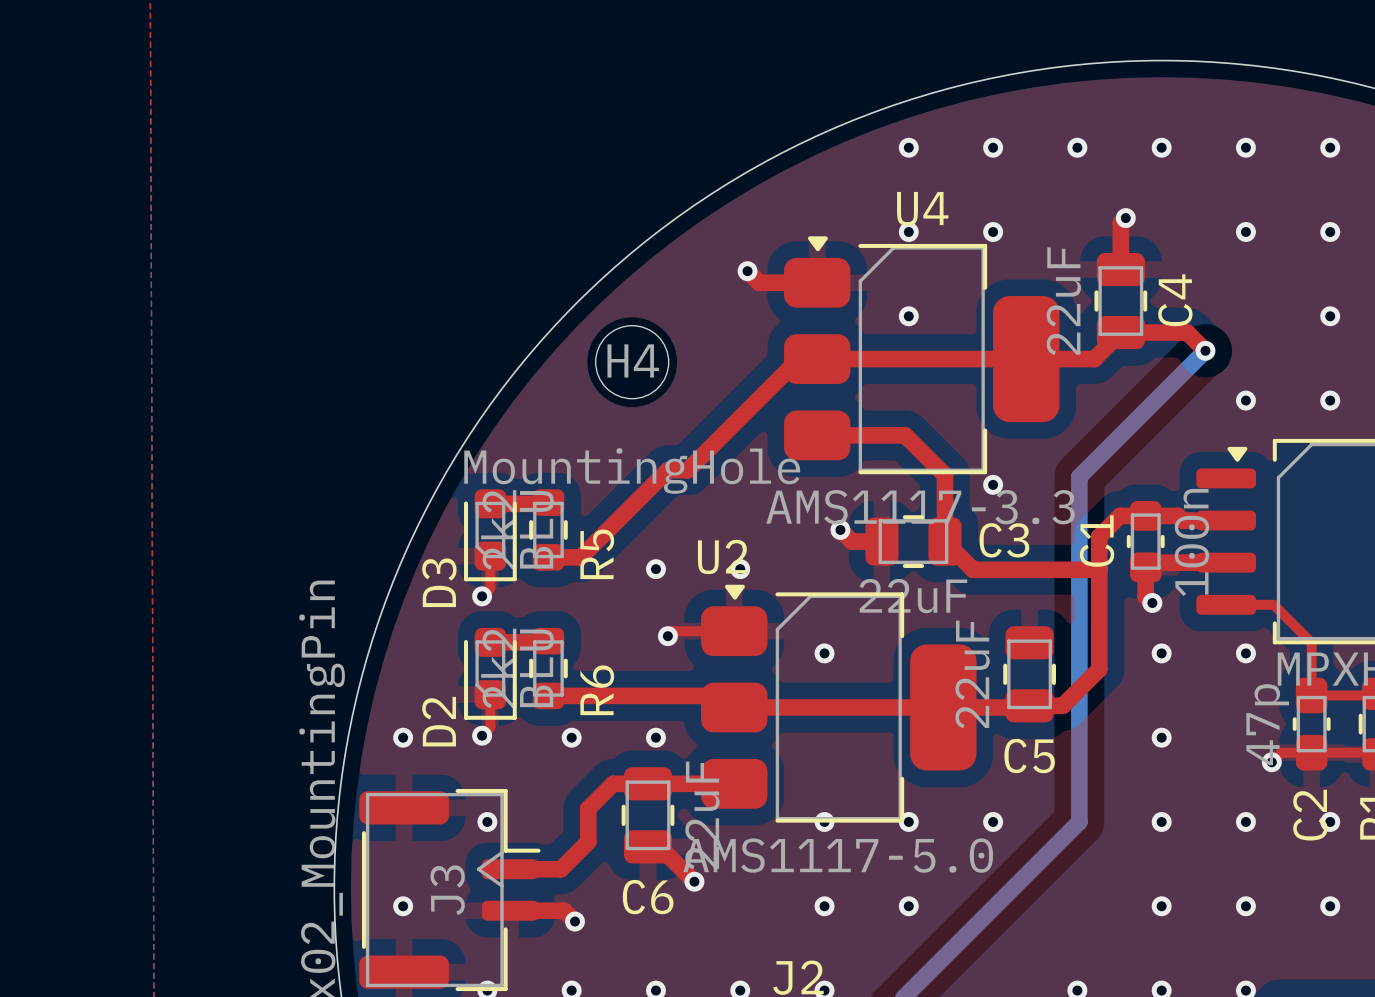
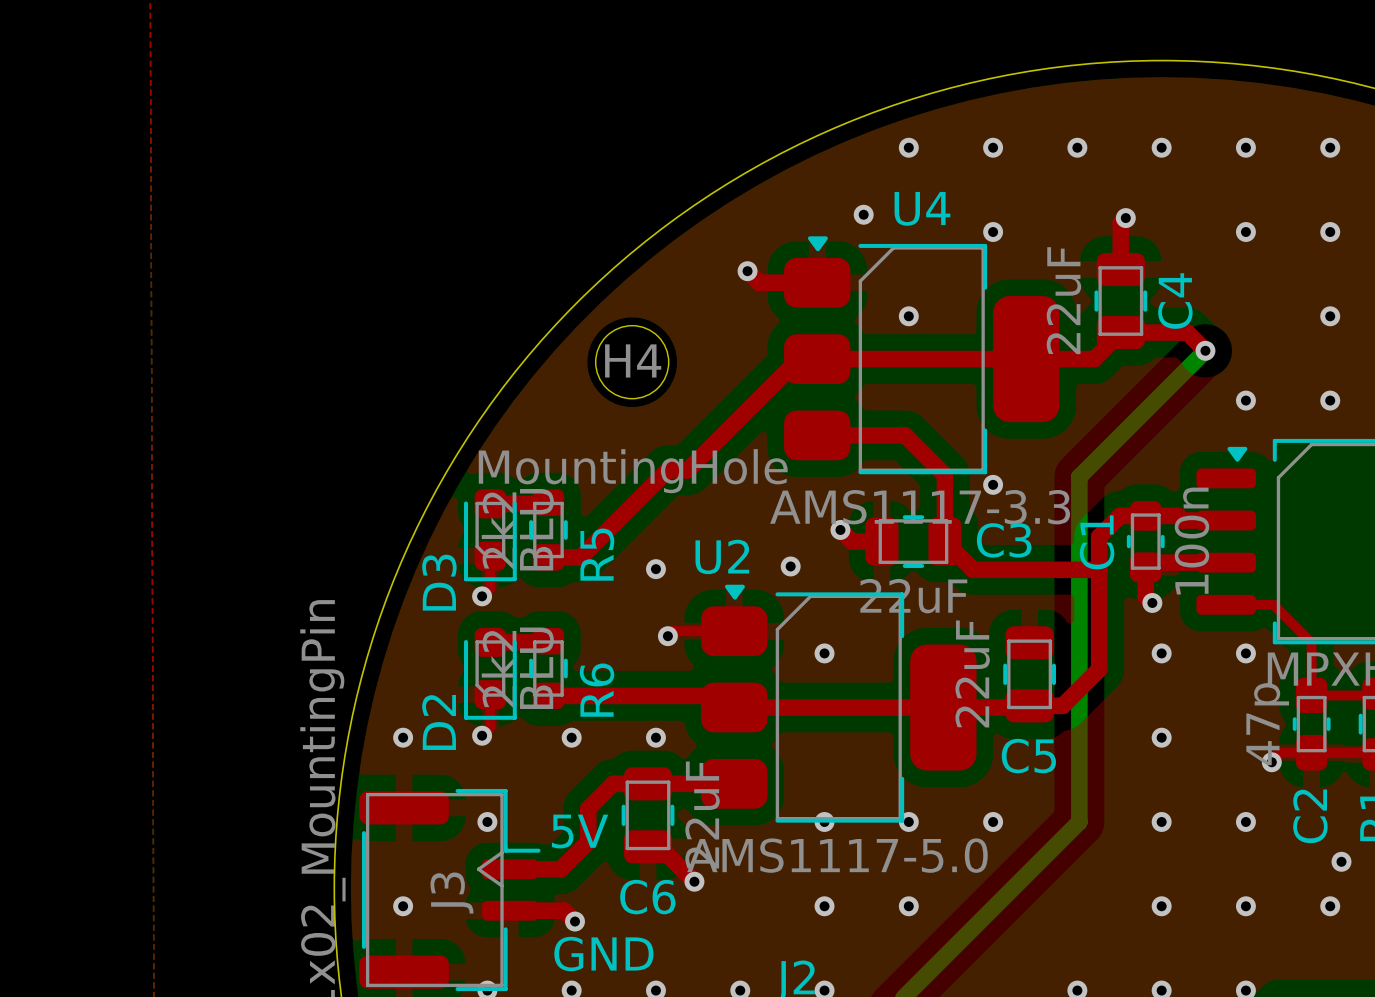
via position: (908, 232) -> (863, 214)
via position: (740, 569) -> (790, 566)
via position: (1330, 821) -> (1341, 861)
text: none -> 5V (580, 831)
text: none -> GND (603, 953)

